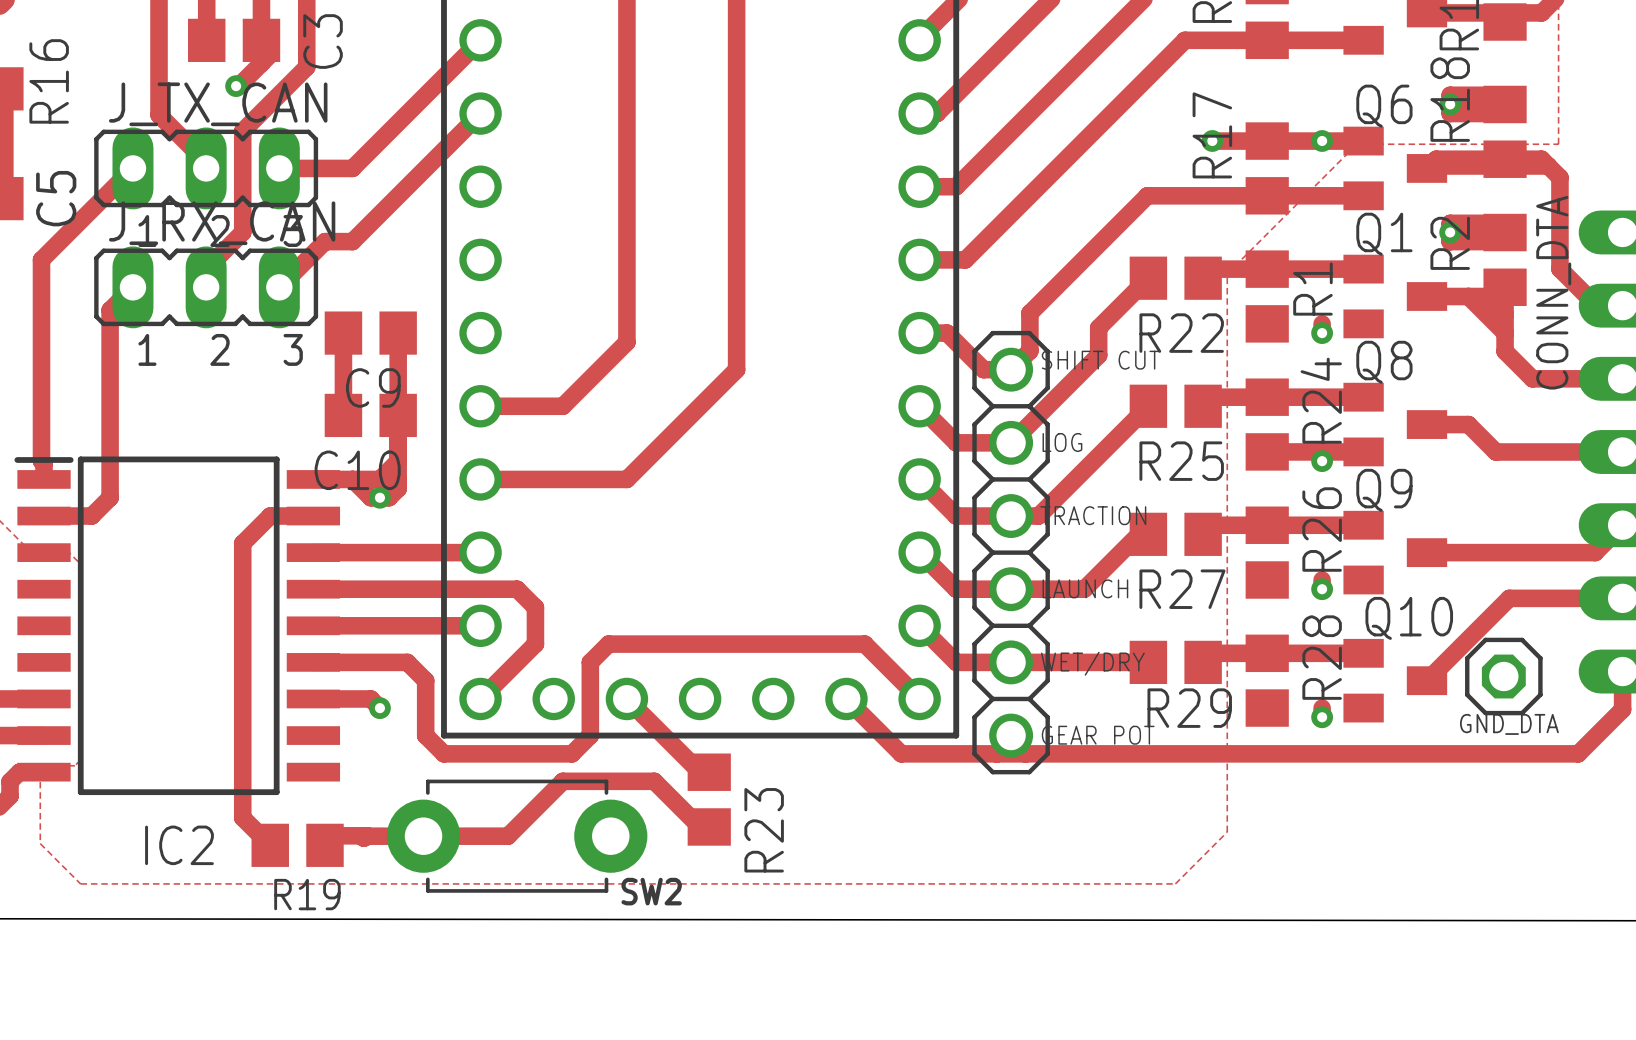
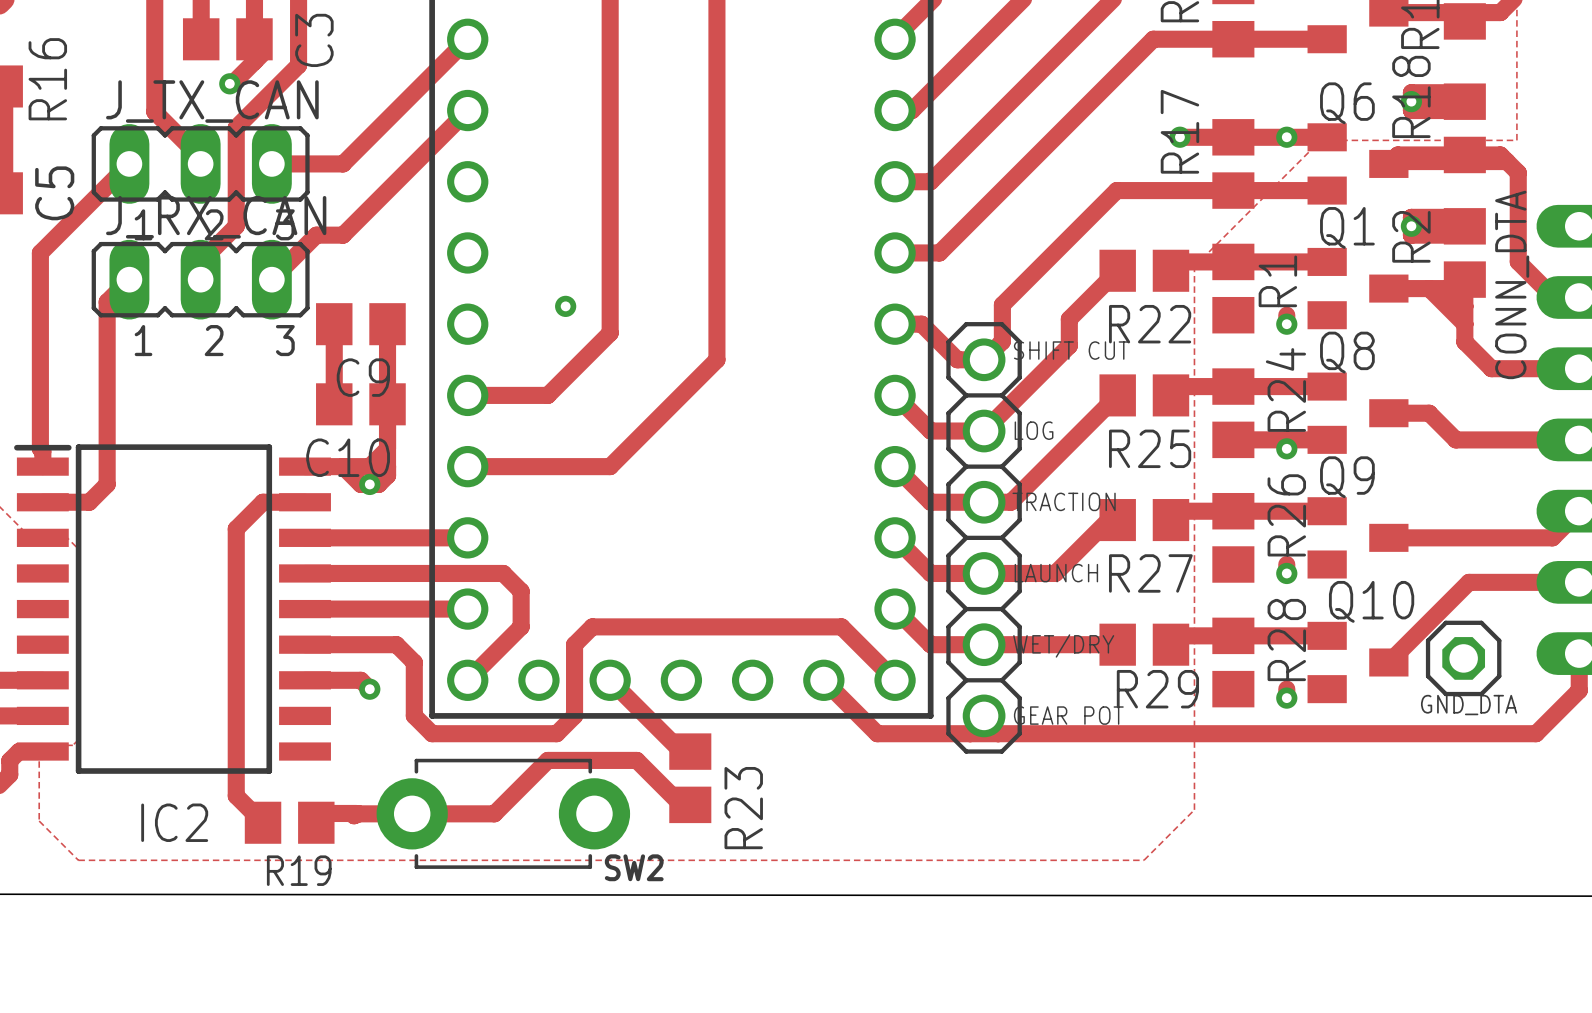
via: none -> (565, 306)

